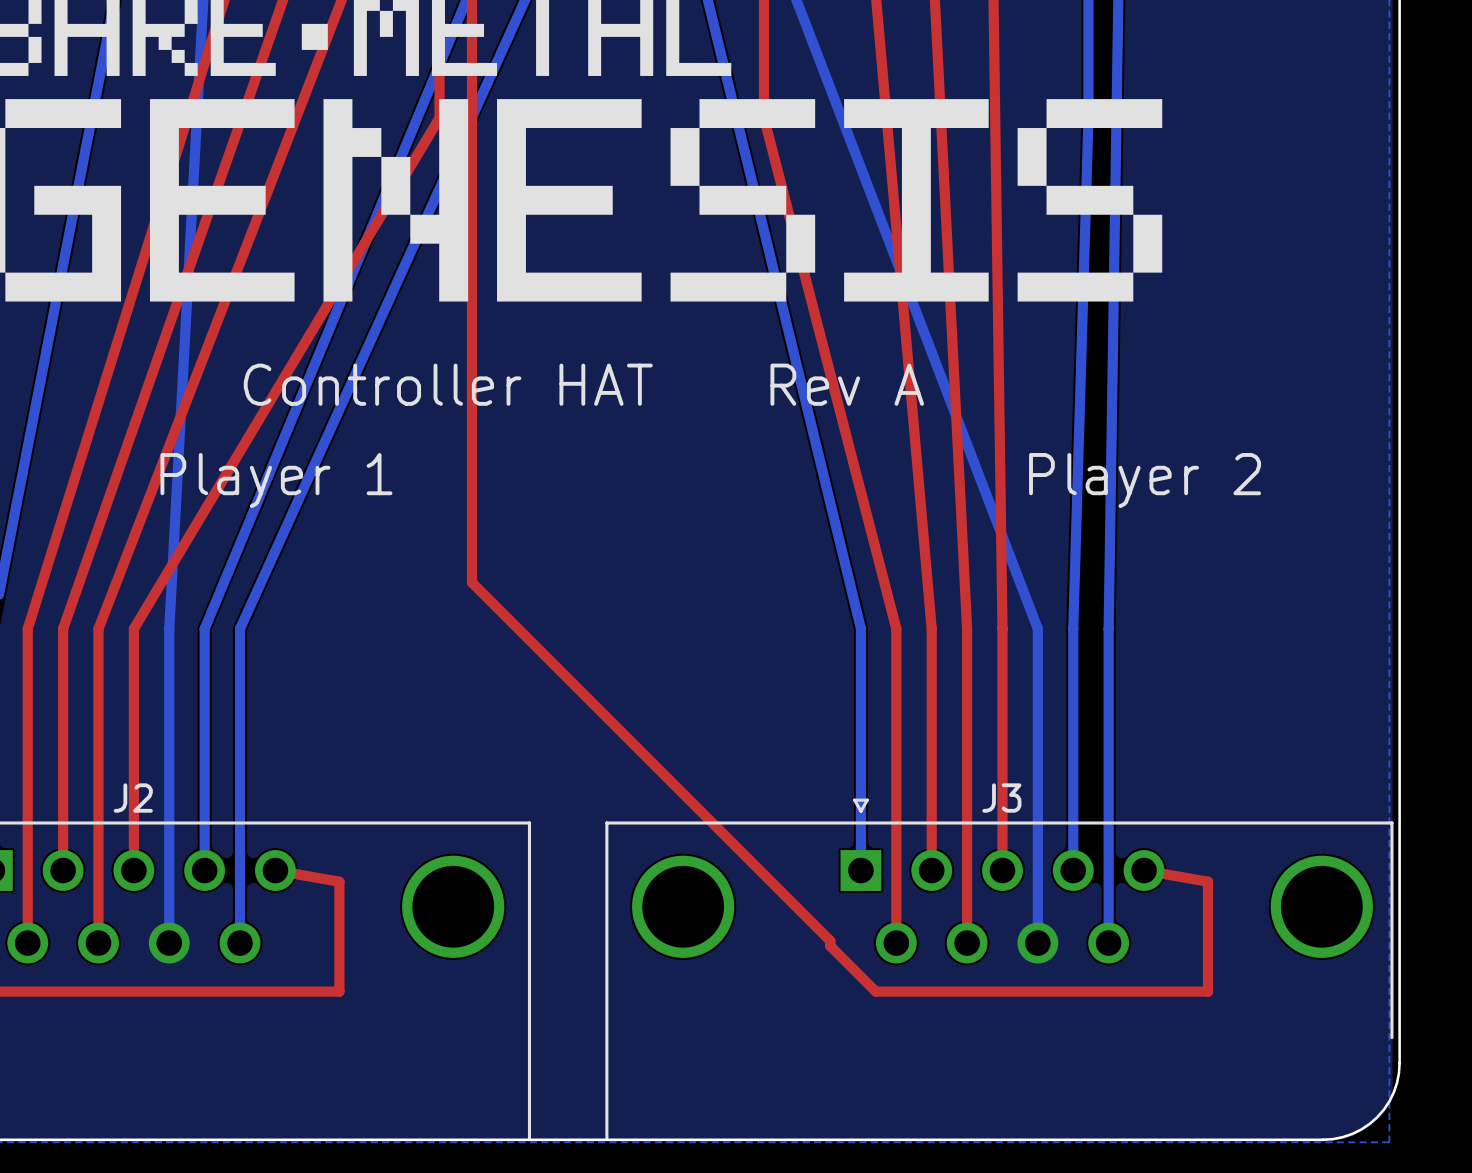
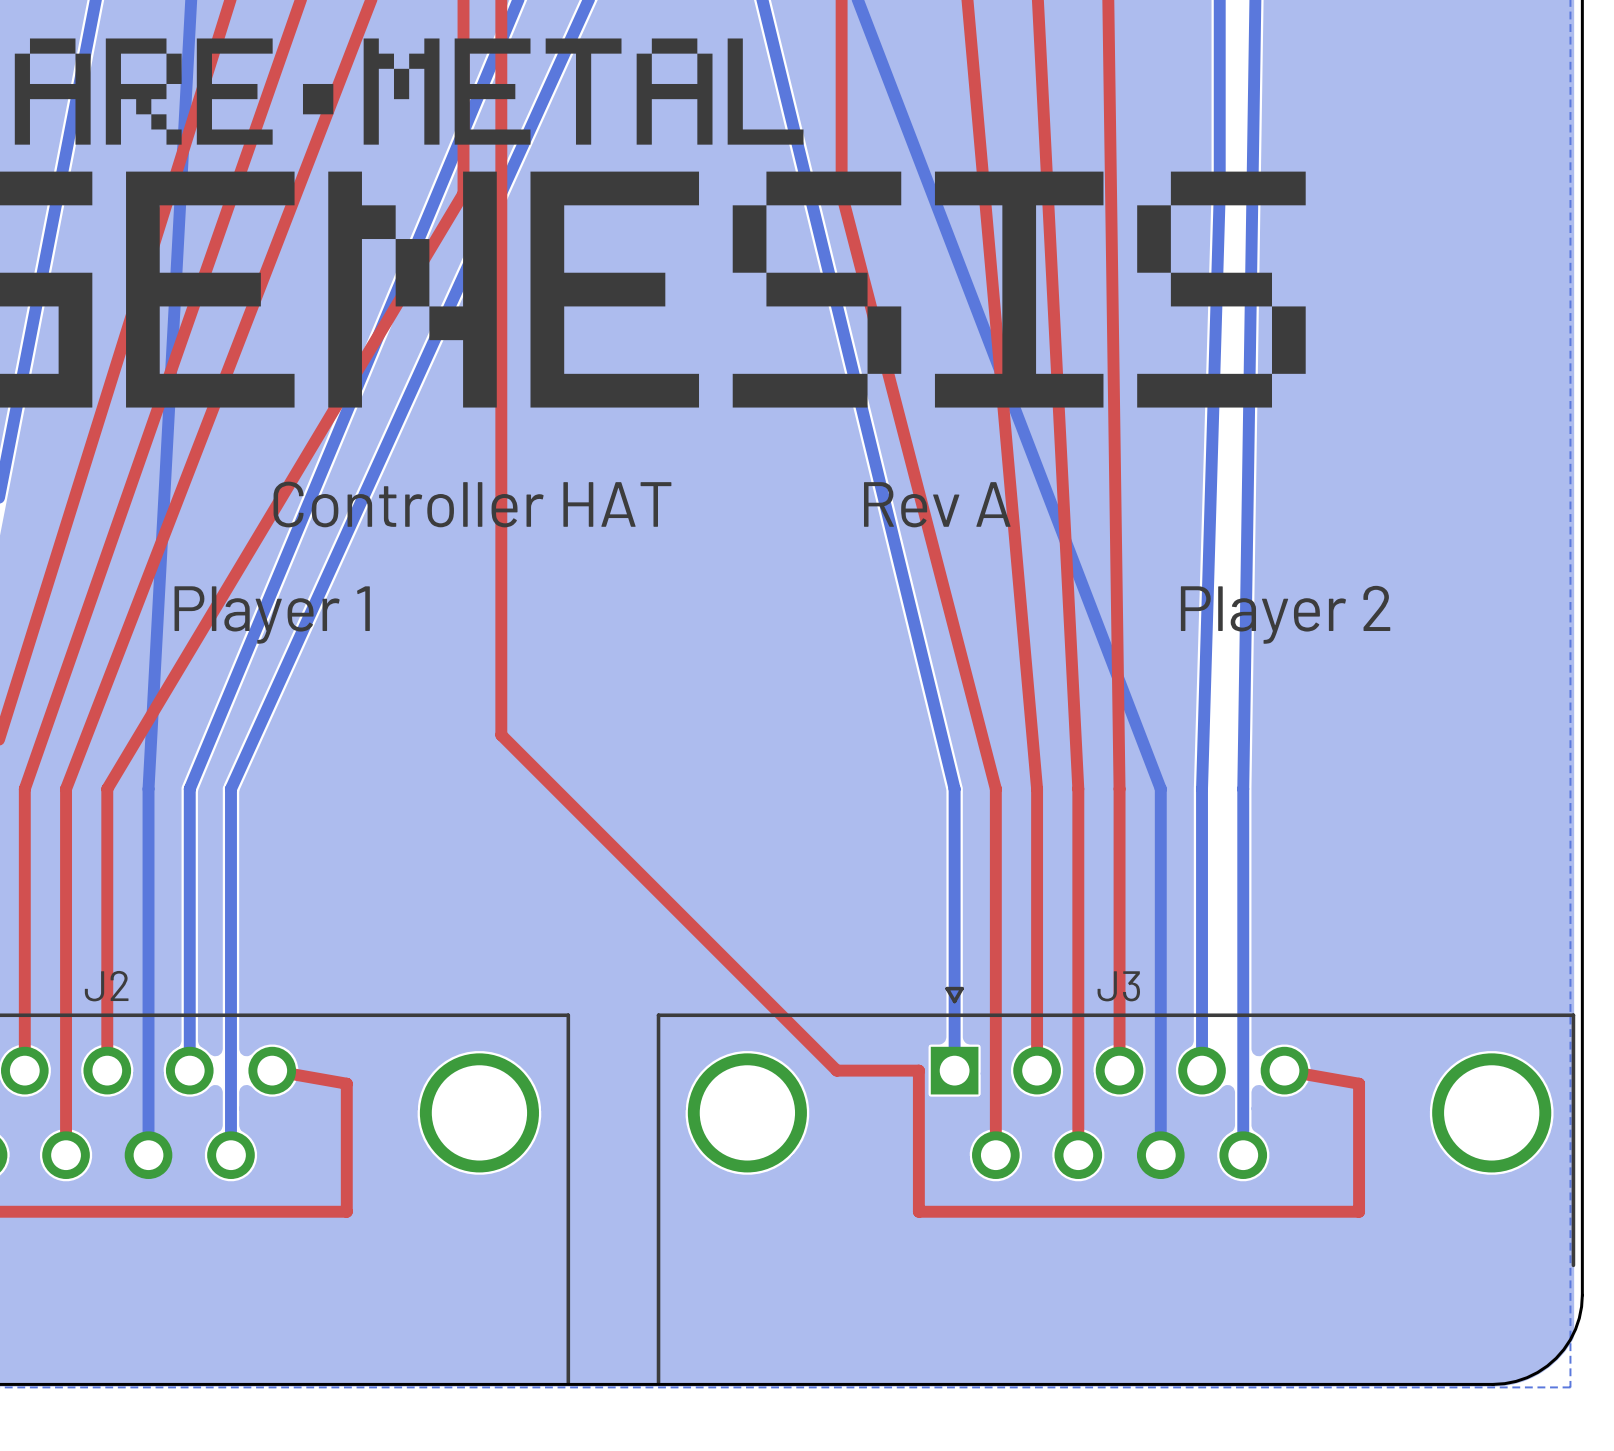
top track: (759, 870) (830, 940) -> (836, 1070) (918, 1070) (918, 1152)
top track: (830, 946) (875, 991) -> (918, 1158) (918, 1211) (972, 1211)

